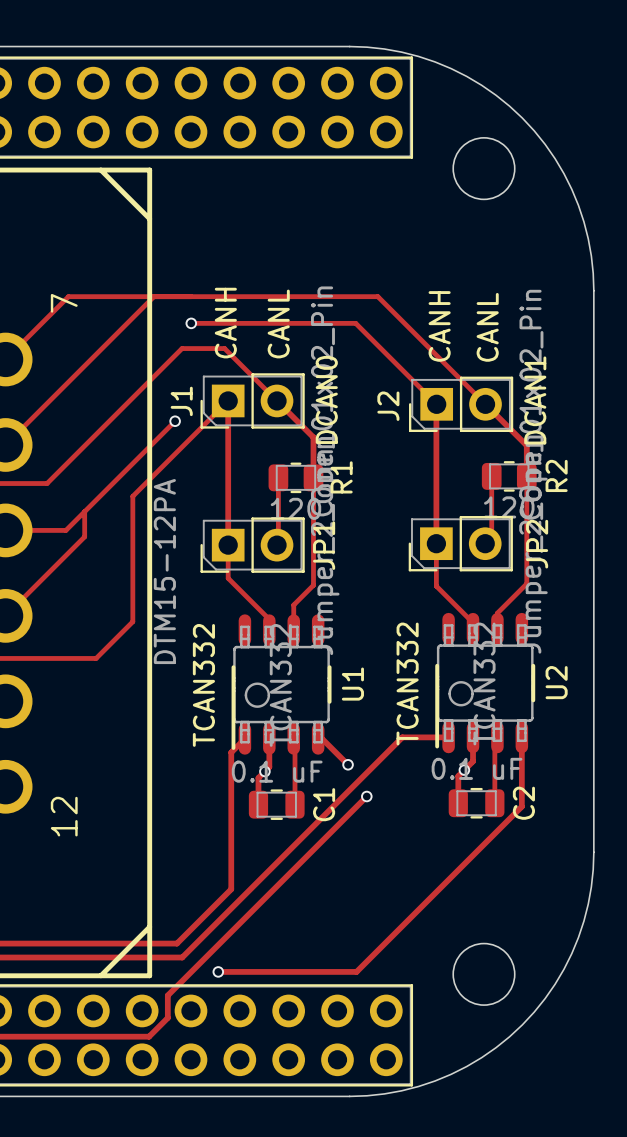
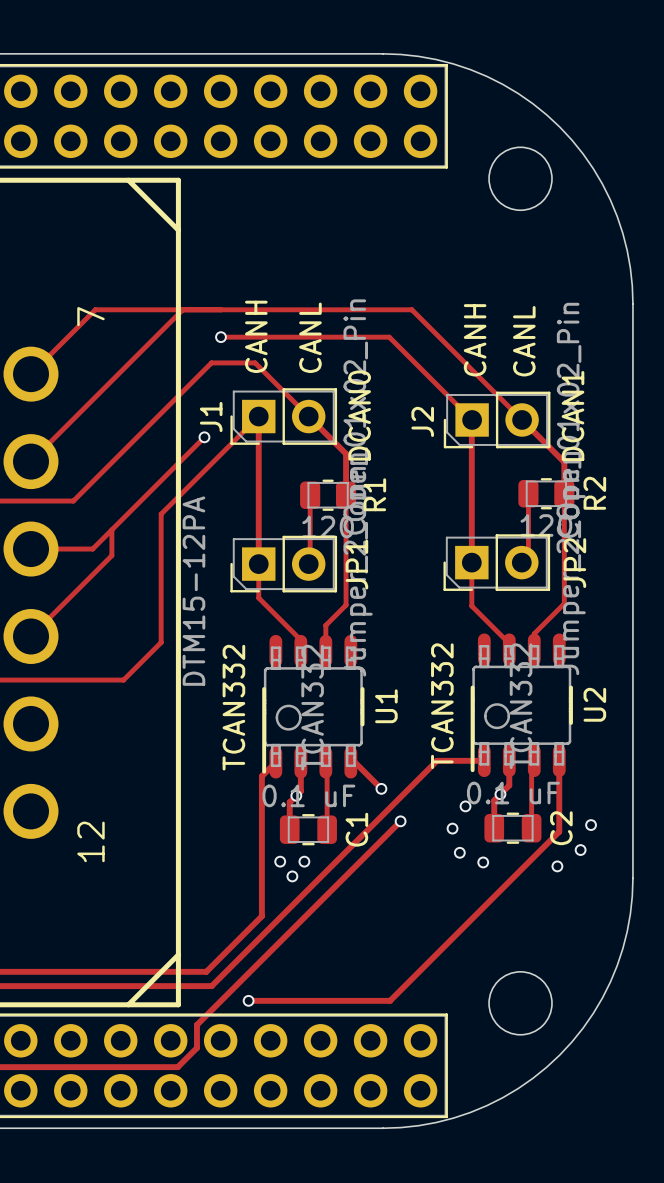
via: none -> (465, 806)
via: none -> (591, 825)
via: none -> (452, 828)
via: none -> (580, 850)
via: none -> (459, 852)
via: none -> (280, 861)
via: none -> (304, 861)
via: none -> (483, 862)
via: none -> (557, 866)
via: none -> (292, 876)

